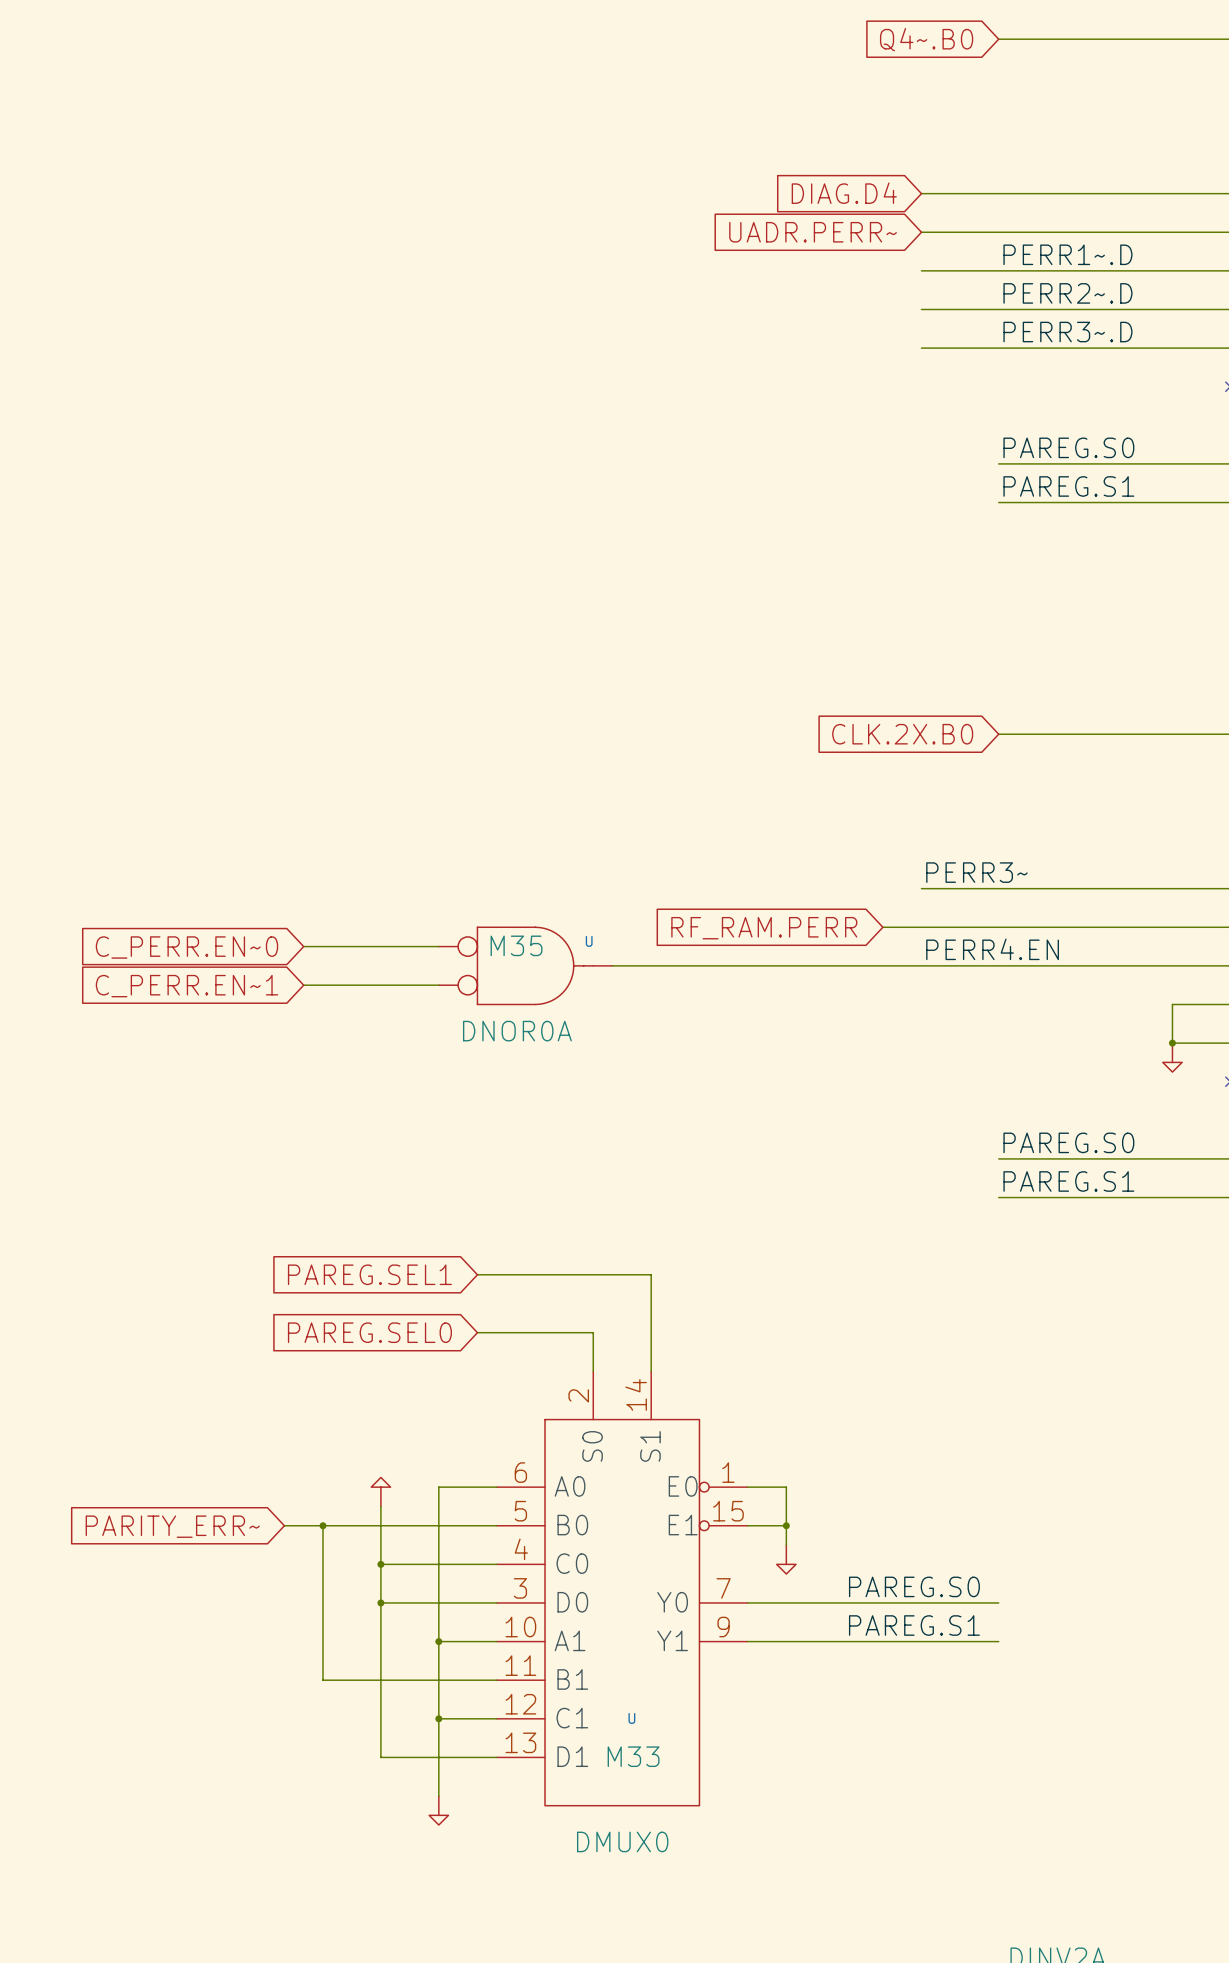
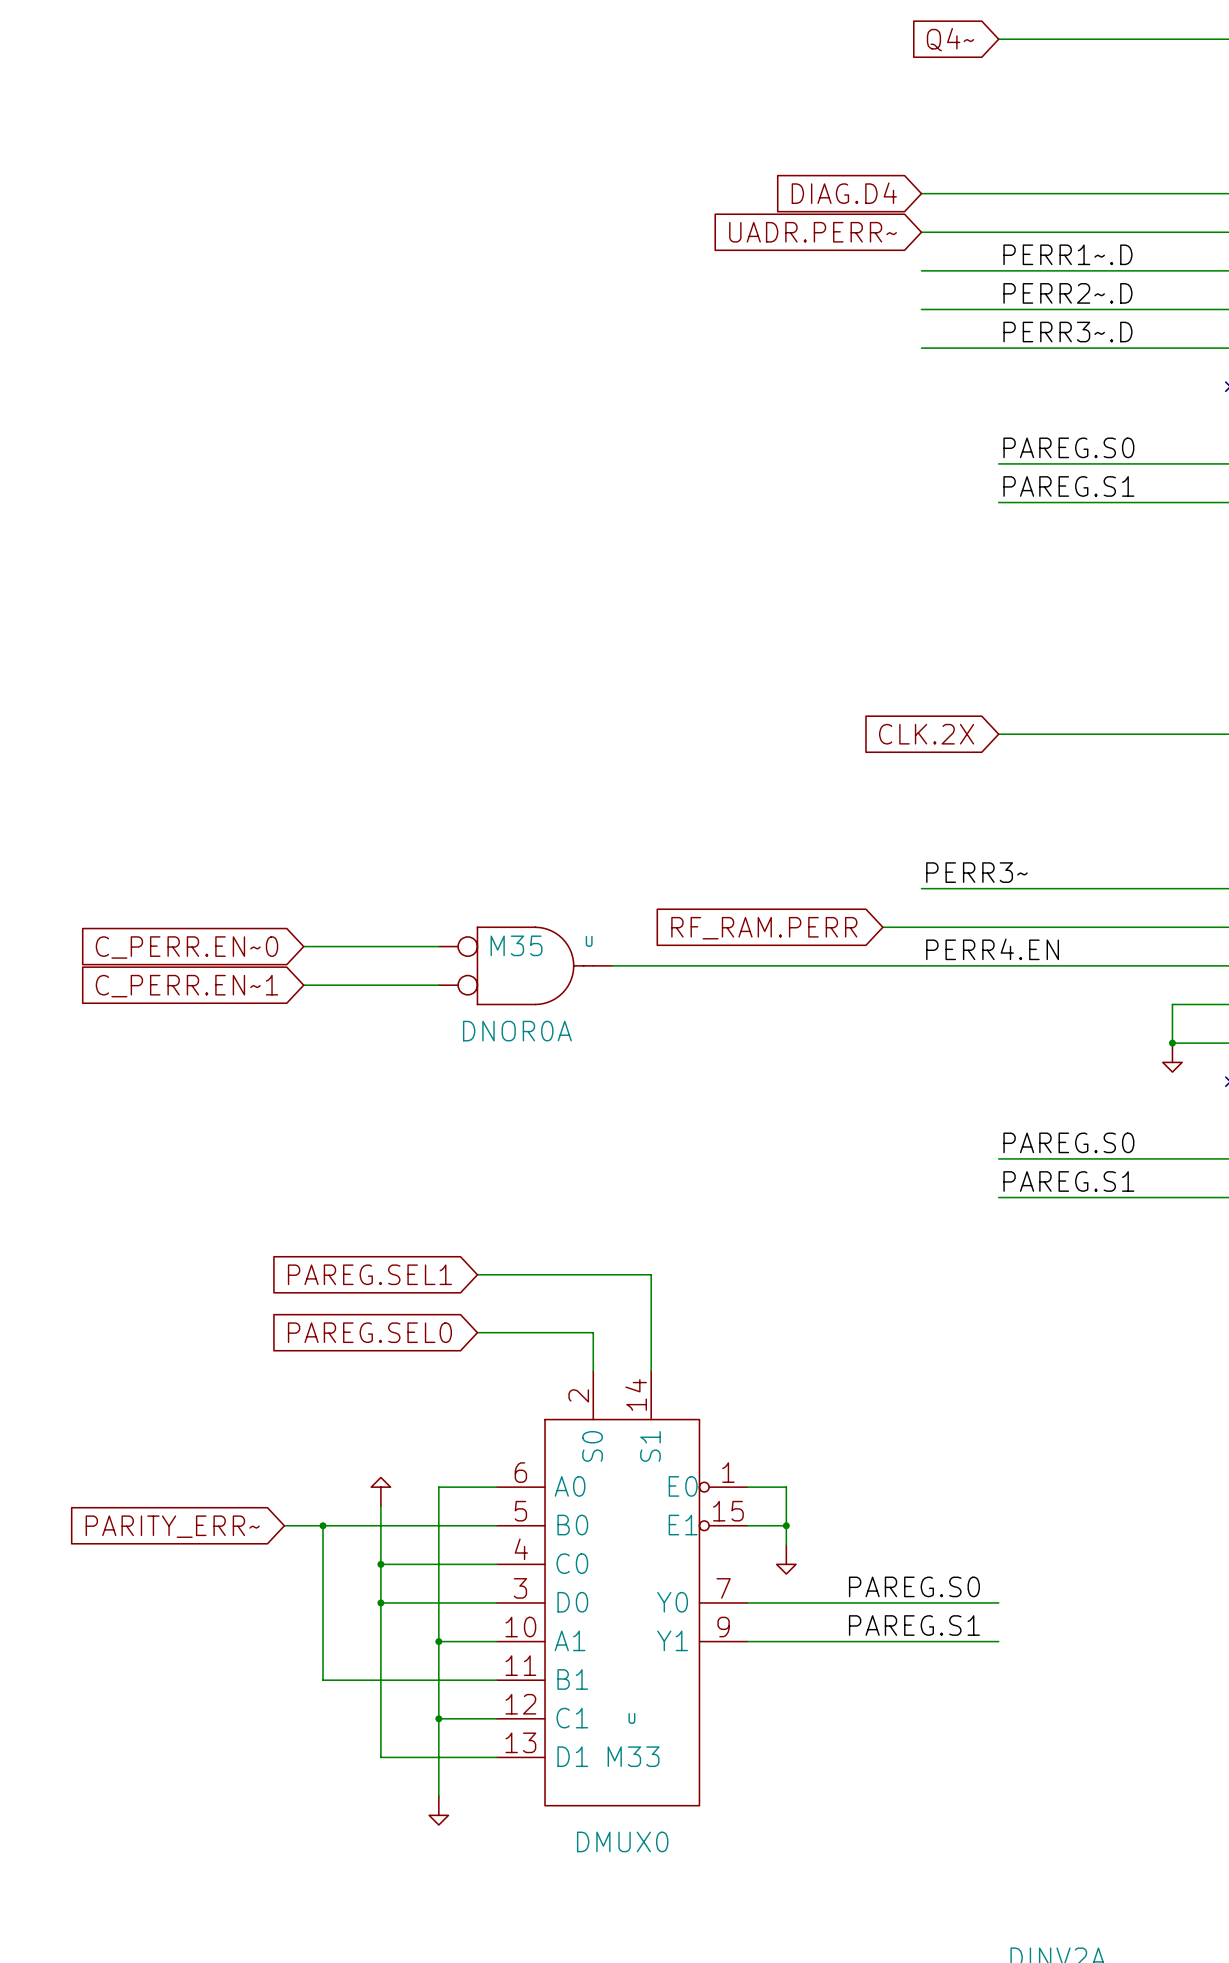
global label: Q4~.B0 (926, 39) -> Q4~ (950, 39)
global label: CLK.2X.B0 (902, 734) -> CLK.2X (926, 734)

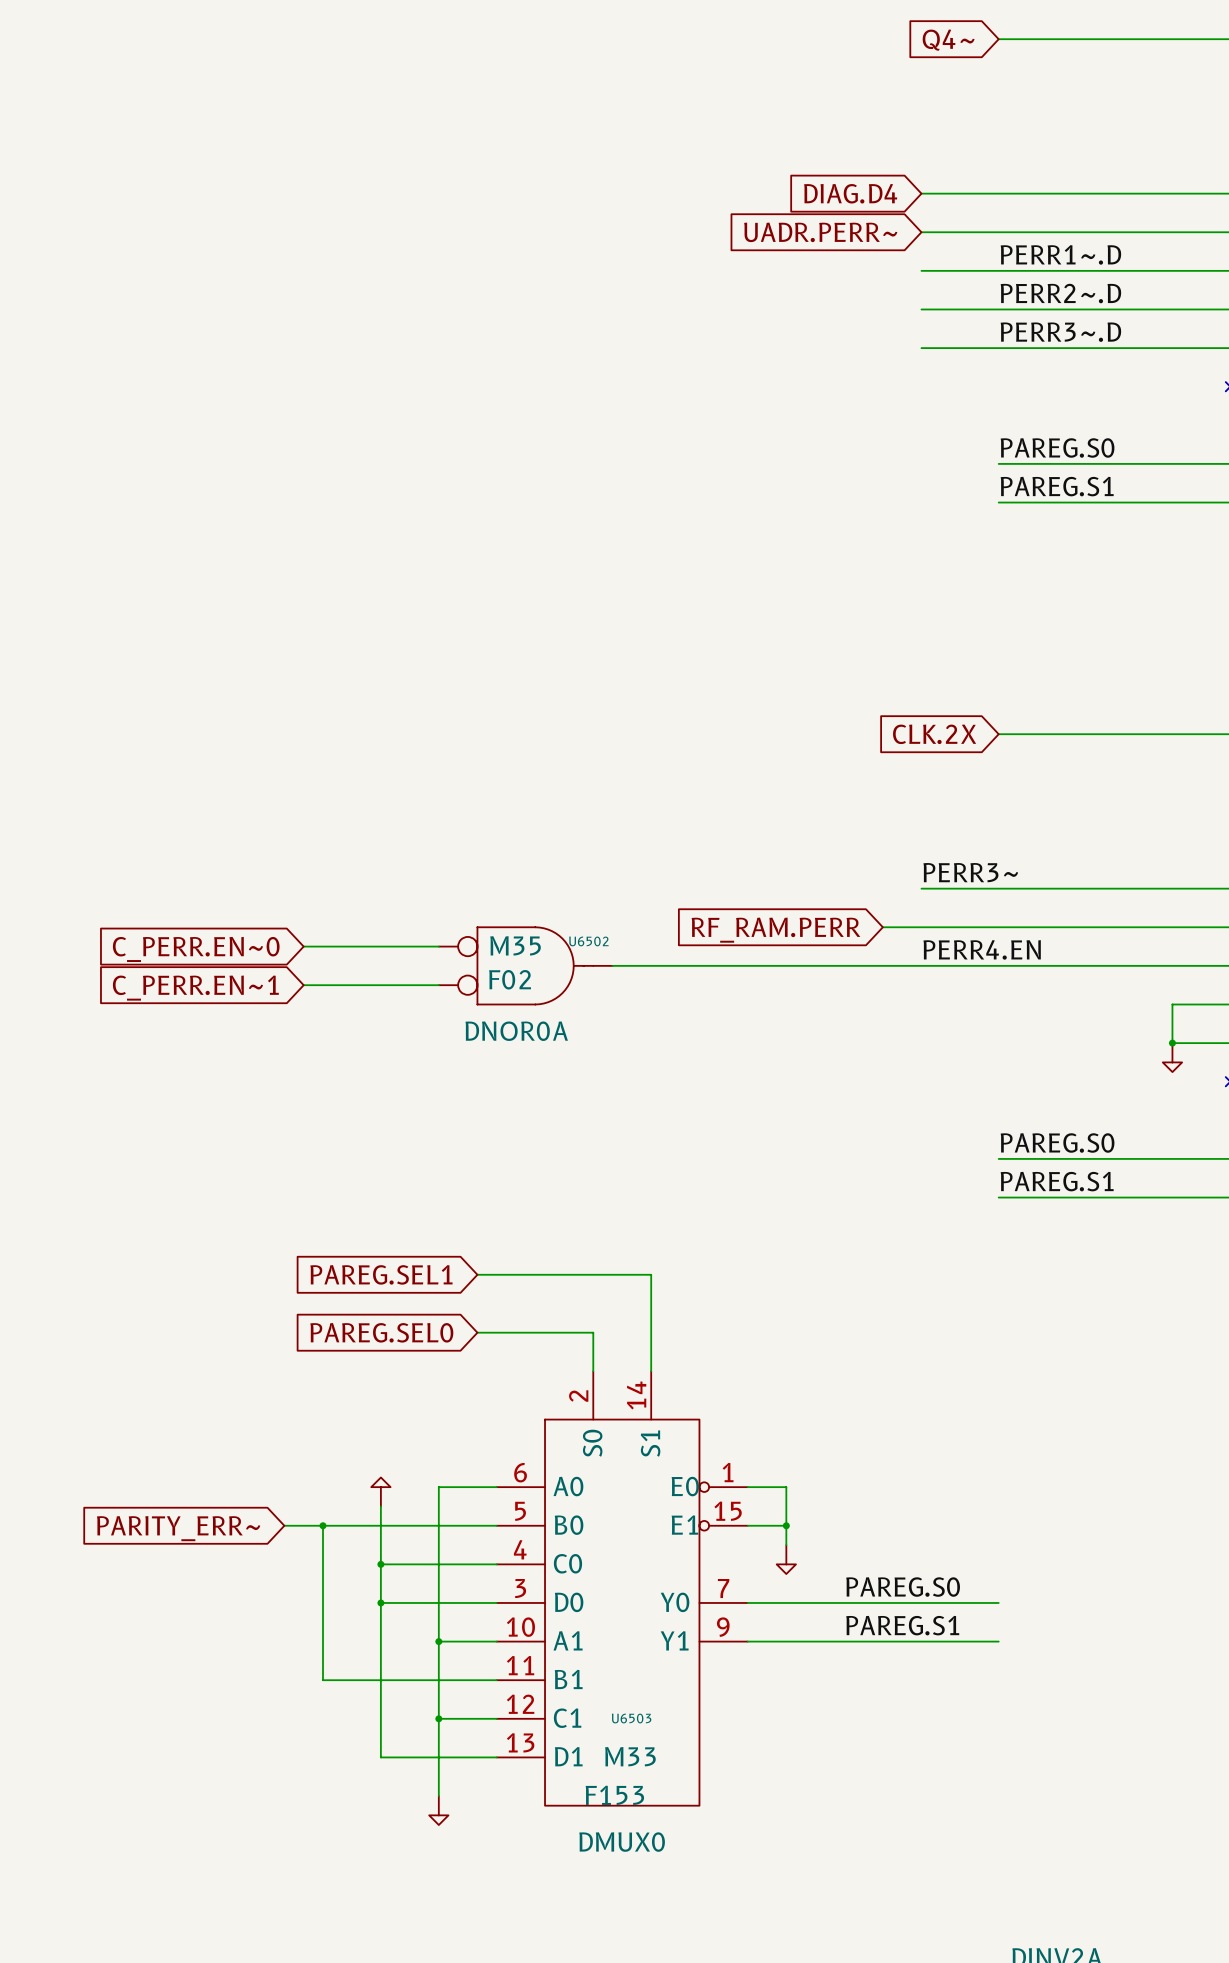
U name: U (589, 941) -> U6502 (588, 941)
U value: none -> F02 (510, 979)
U name: U (631, 1718) -> U6503 (631, 1718)
U value: none -> F153 (614, 1795)

